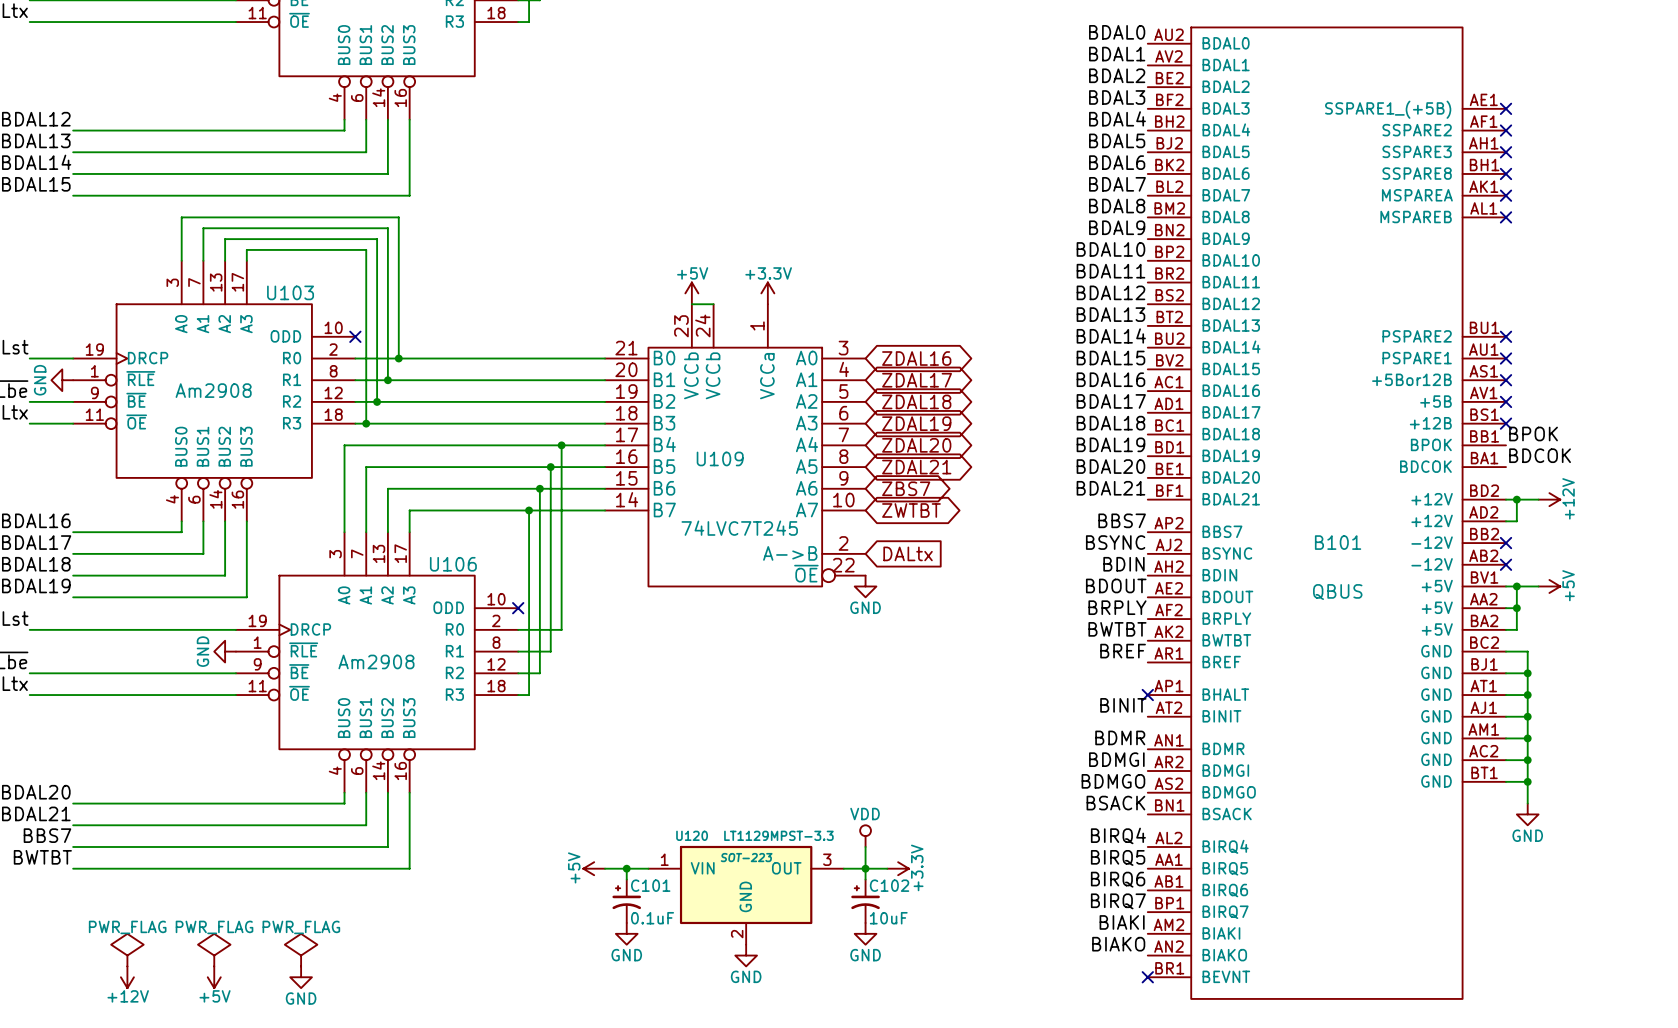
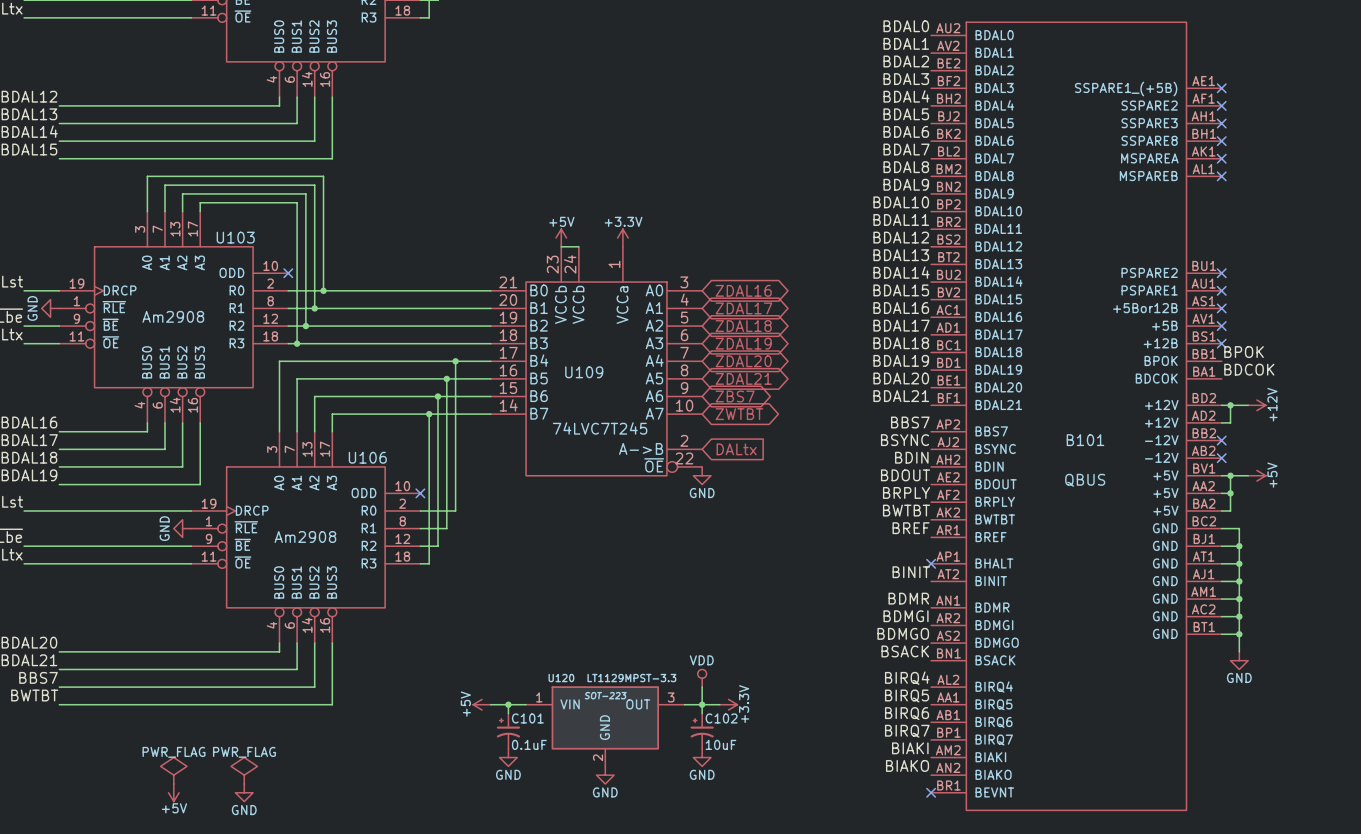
power symbol: PWR_FLAG (127, 950) -> none
power symbol: +12V (127, 977) -> none

